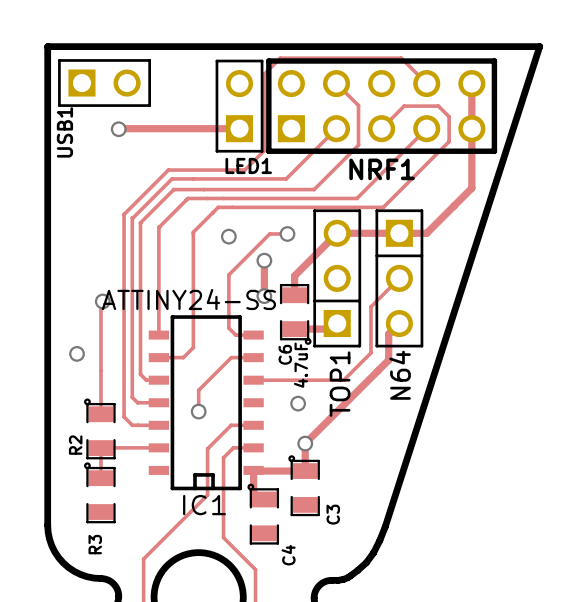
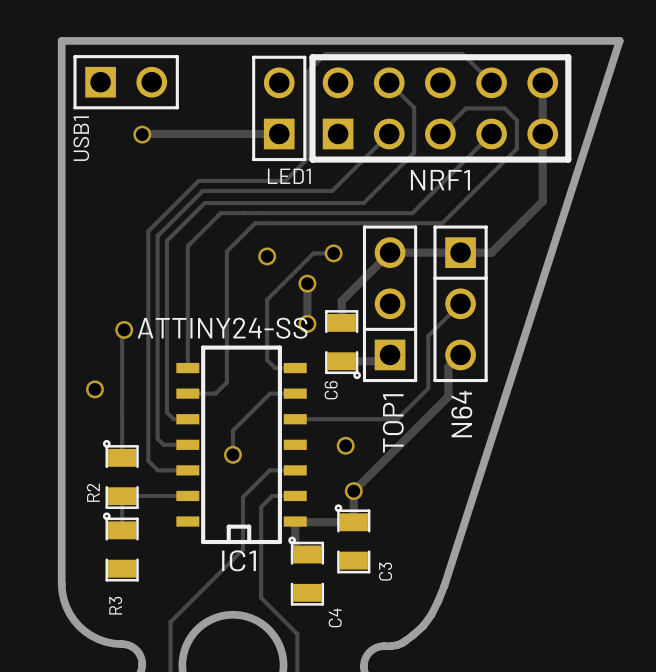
C6 value: 4.7uF (300, 365) -> none

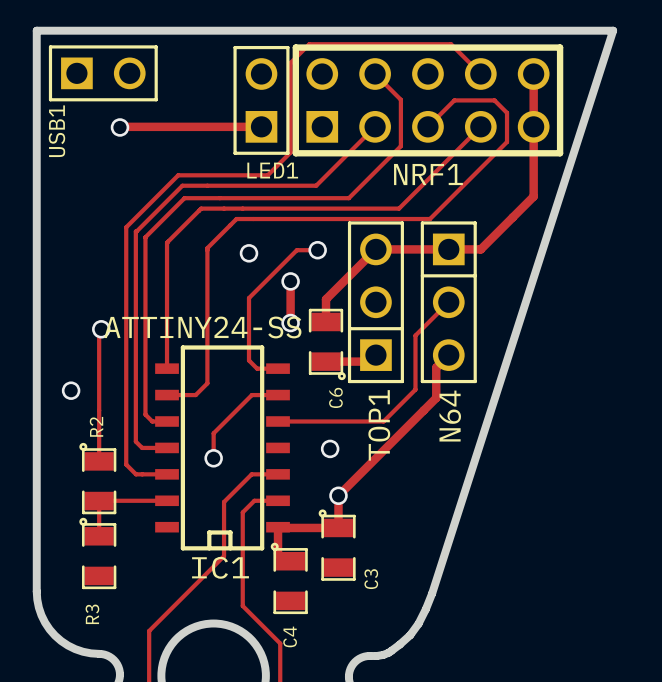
C6 name position: C6 (331, 390) -> C6 (335, 397)
R2 name position: R2 (93, 492) -> R2 (96, 426)
C4 name position: C4 (335, 617) -> C4 (290, 636)

